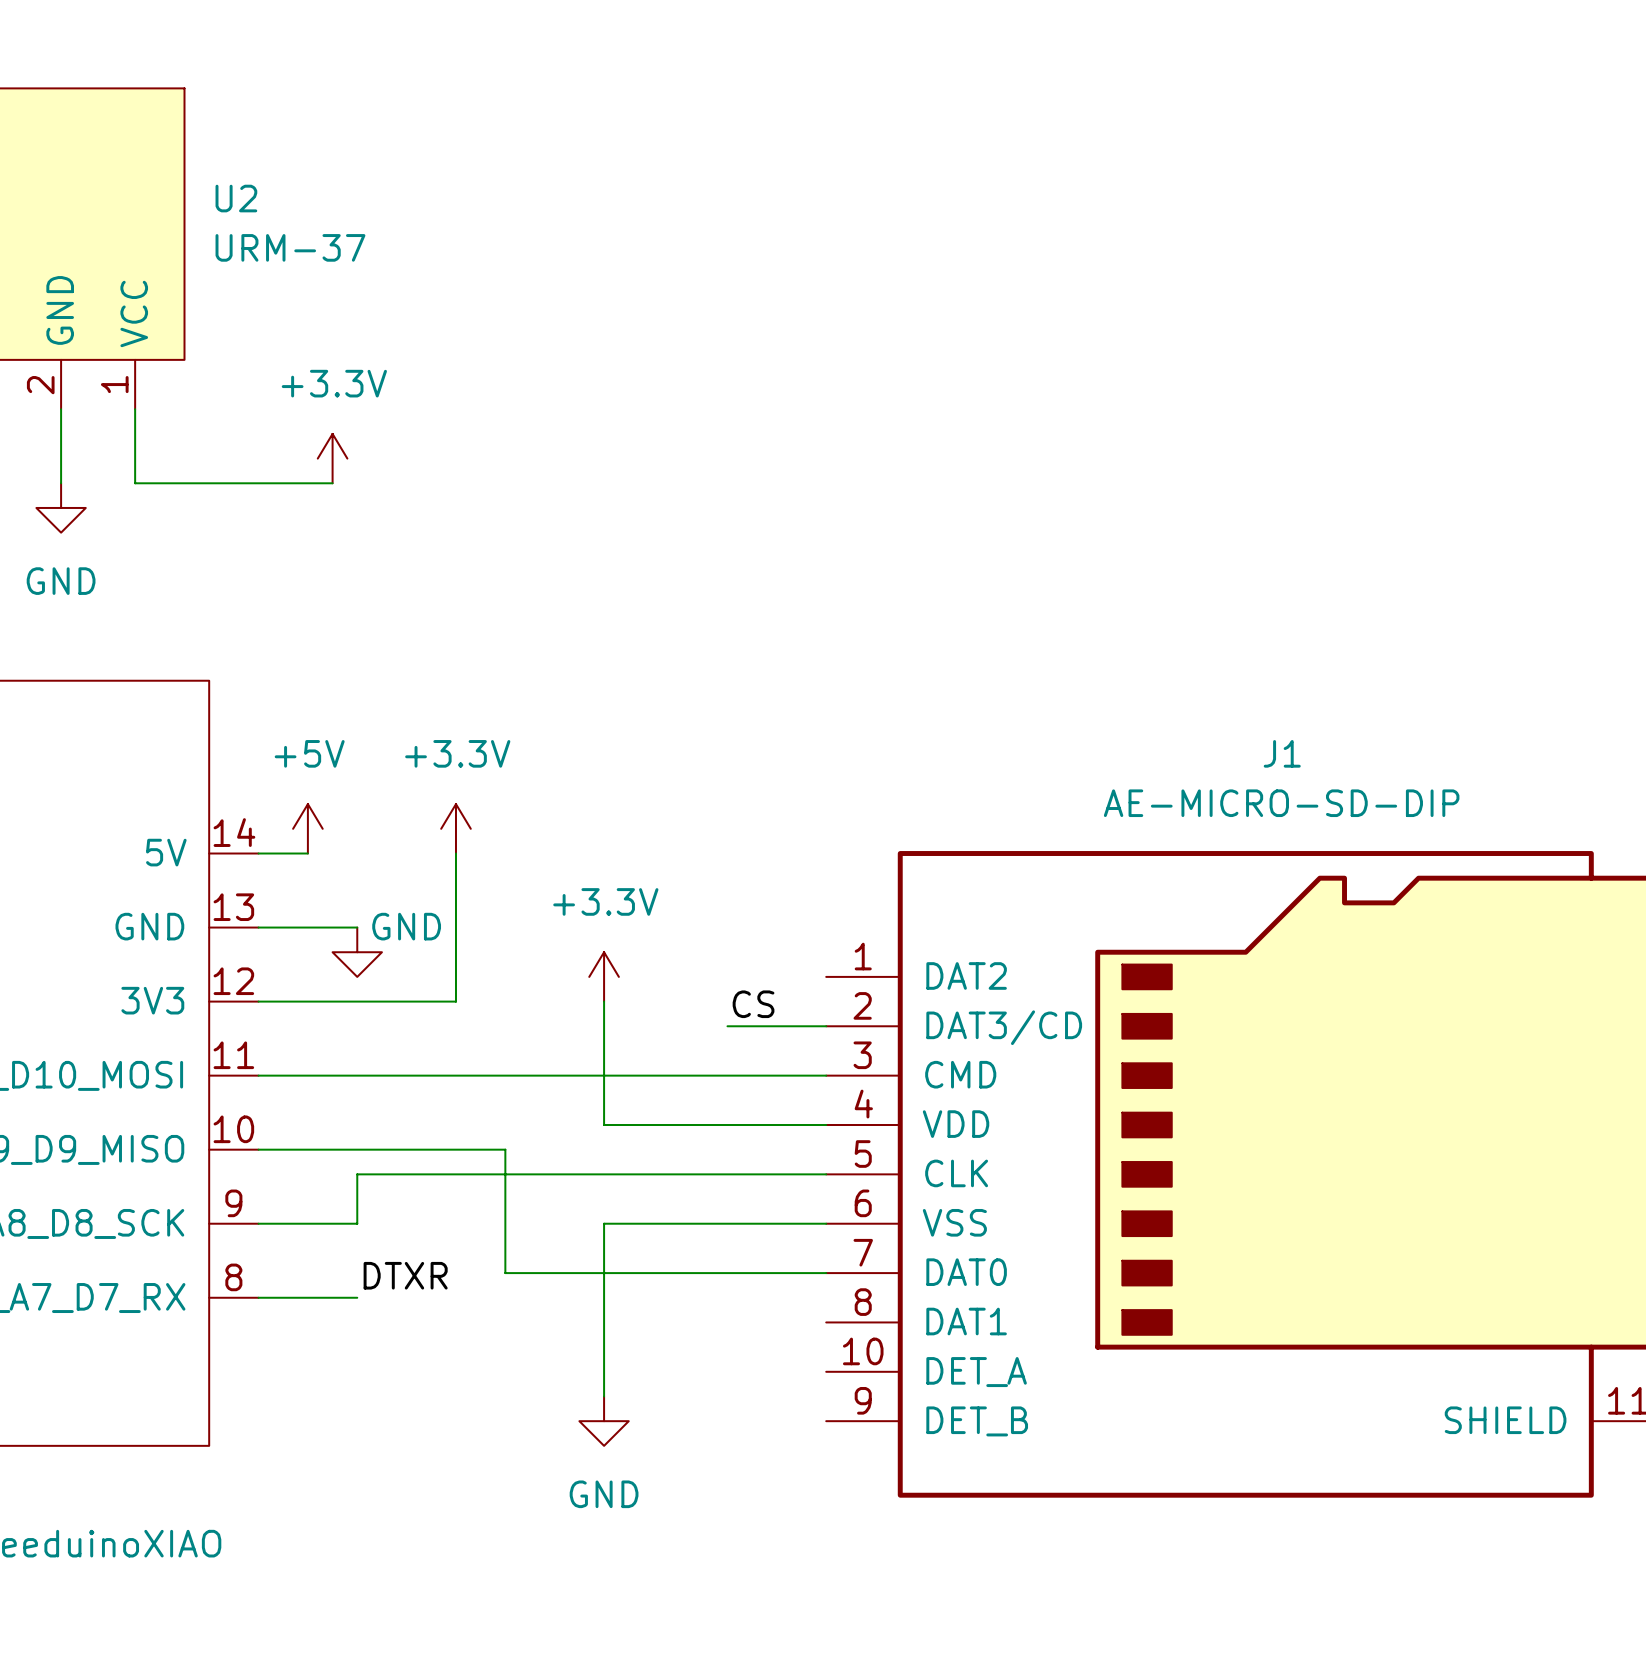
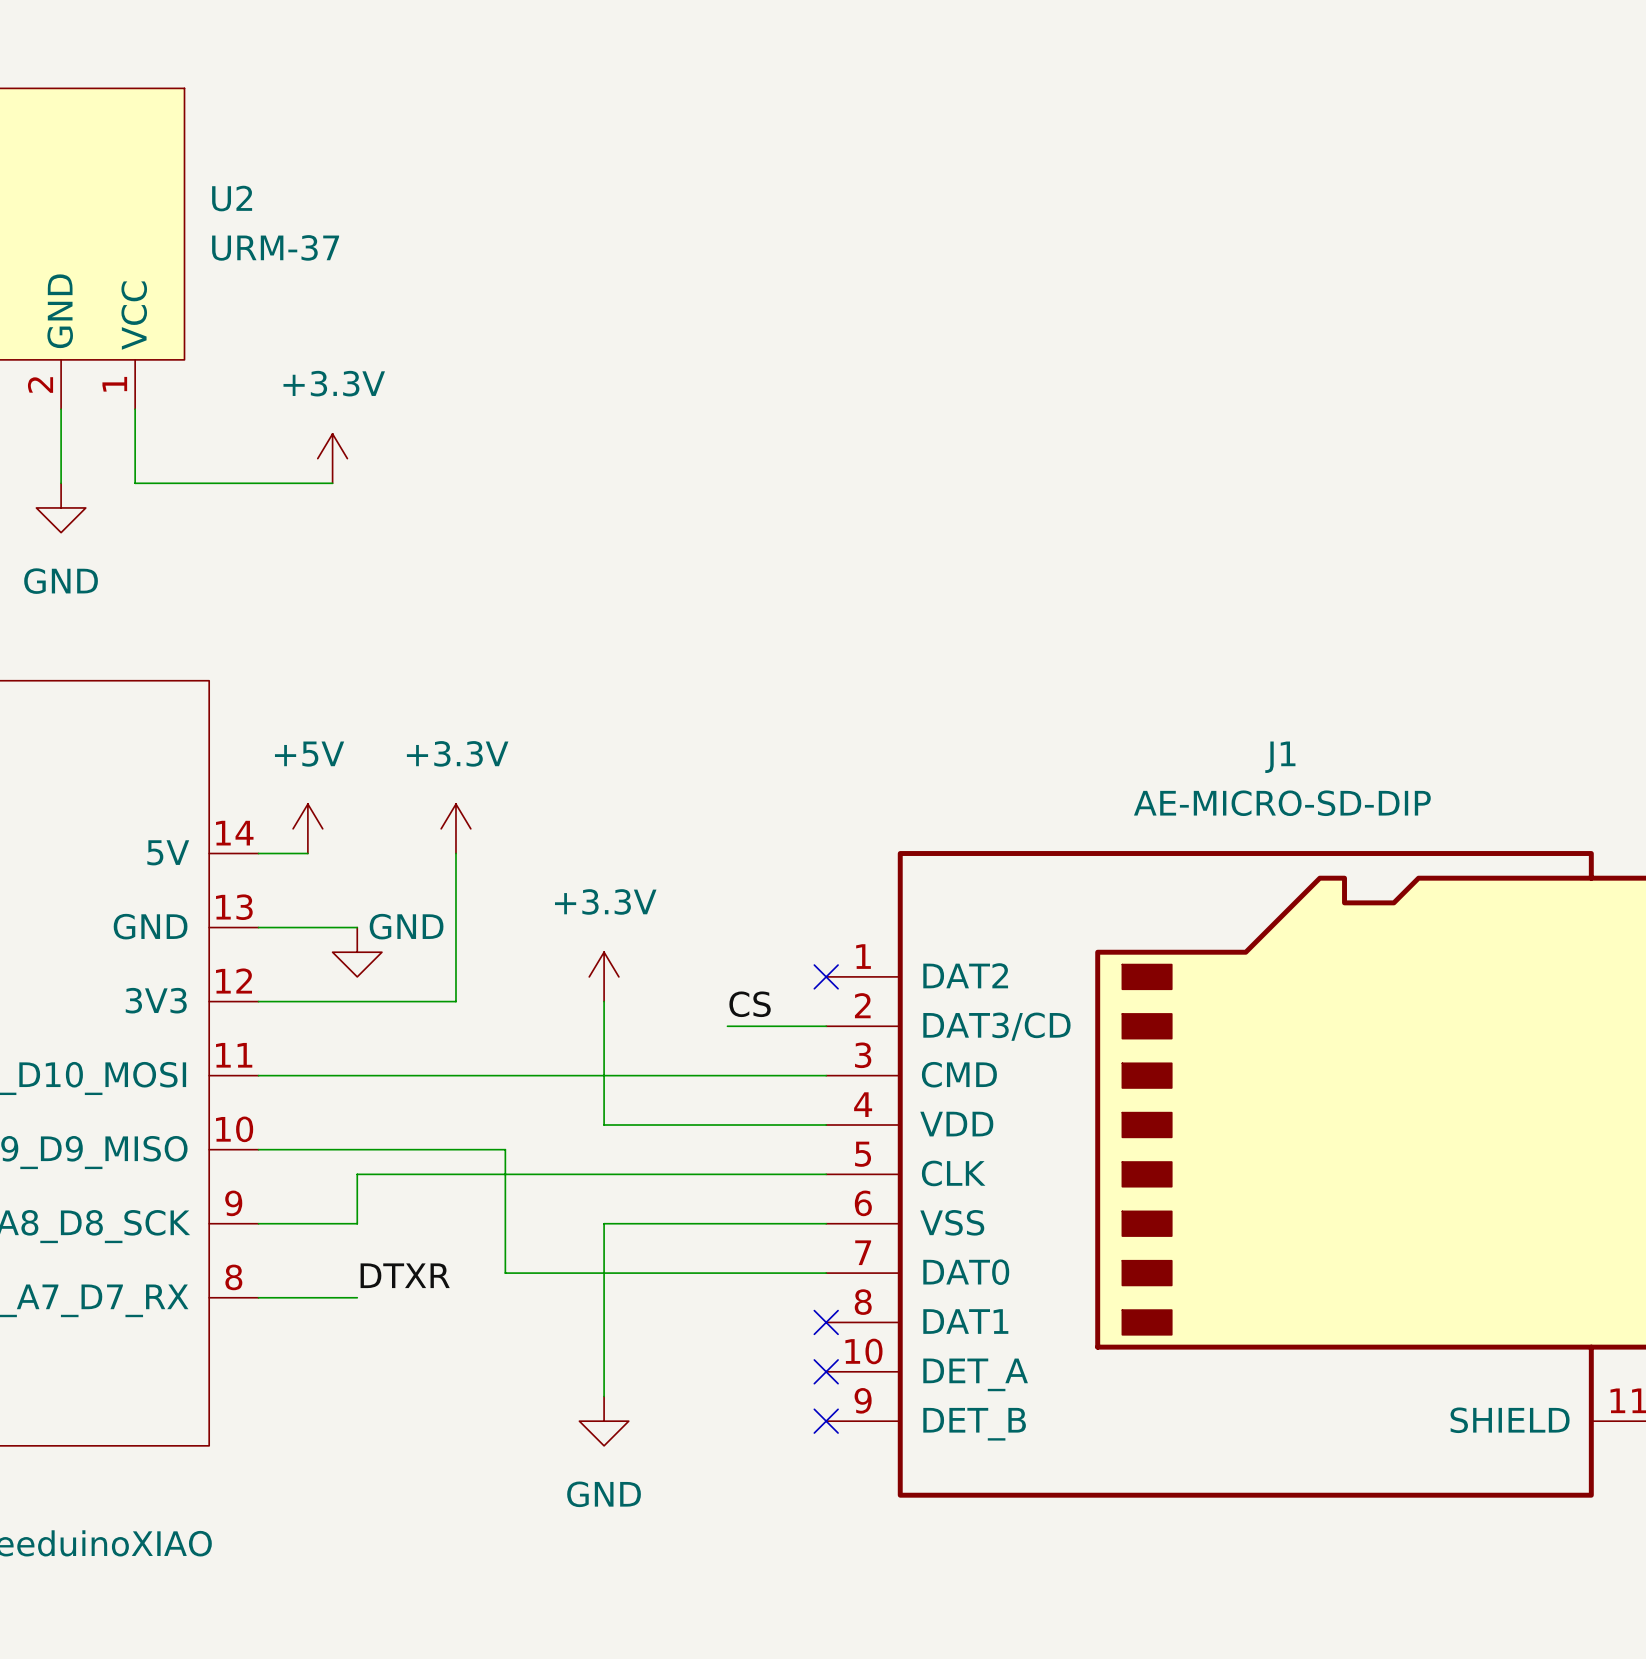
no-connect mark: none -> (826, 976)
no-connect mark: none -> (826, 1322)
no-connect mark: none -> (826, 1371)
no-connect mark: none -> (826, 1421)

